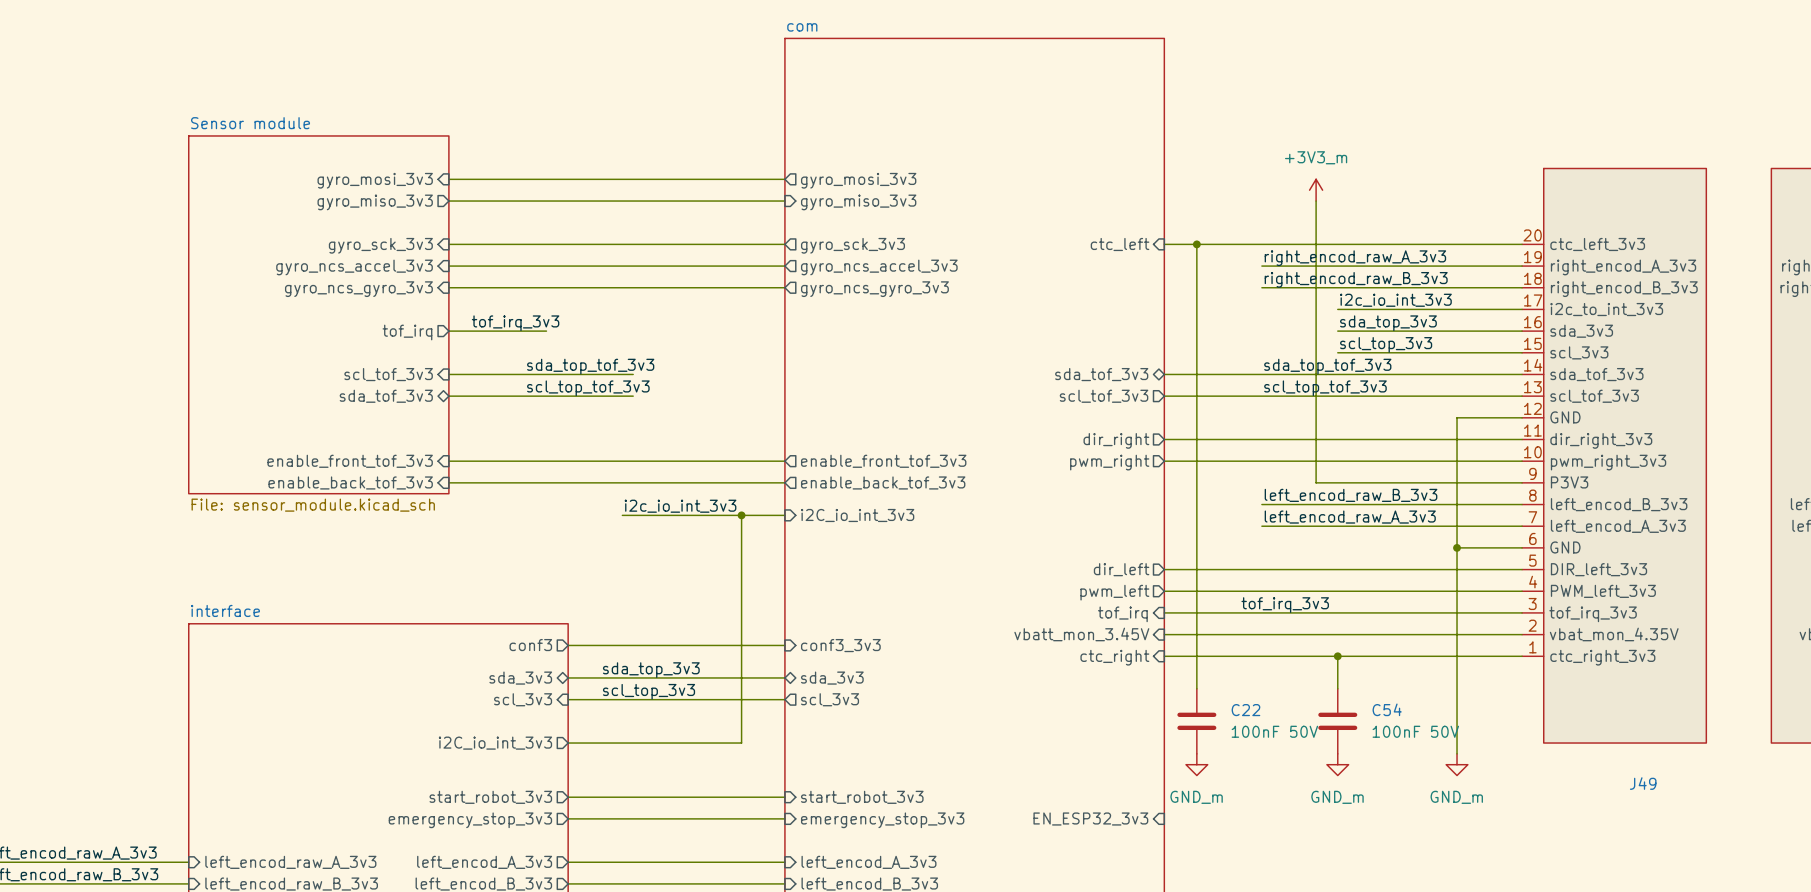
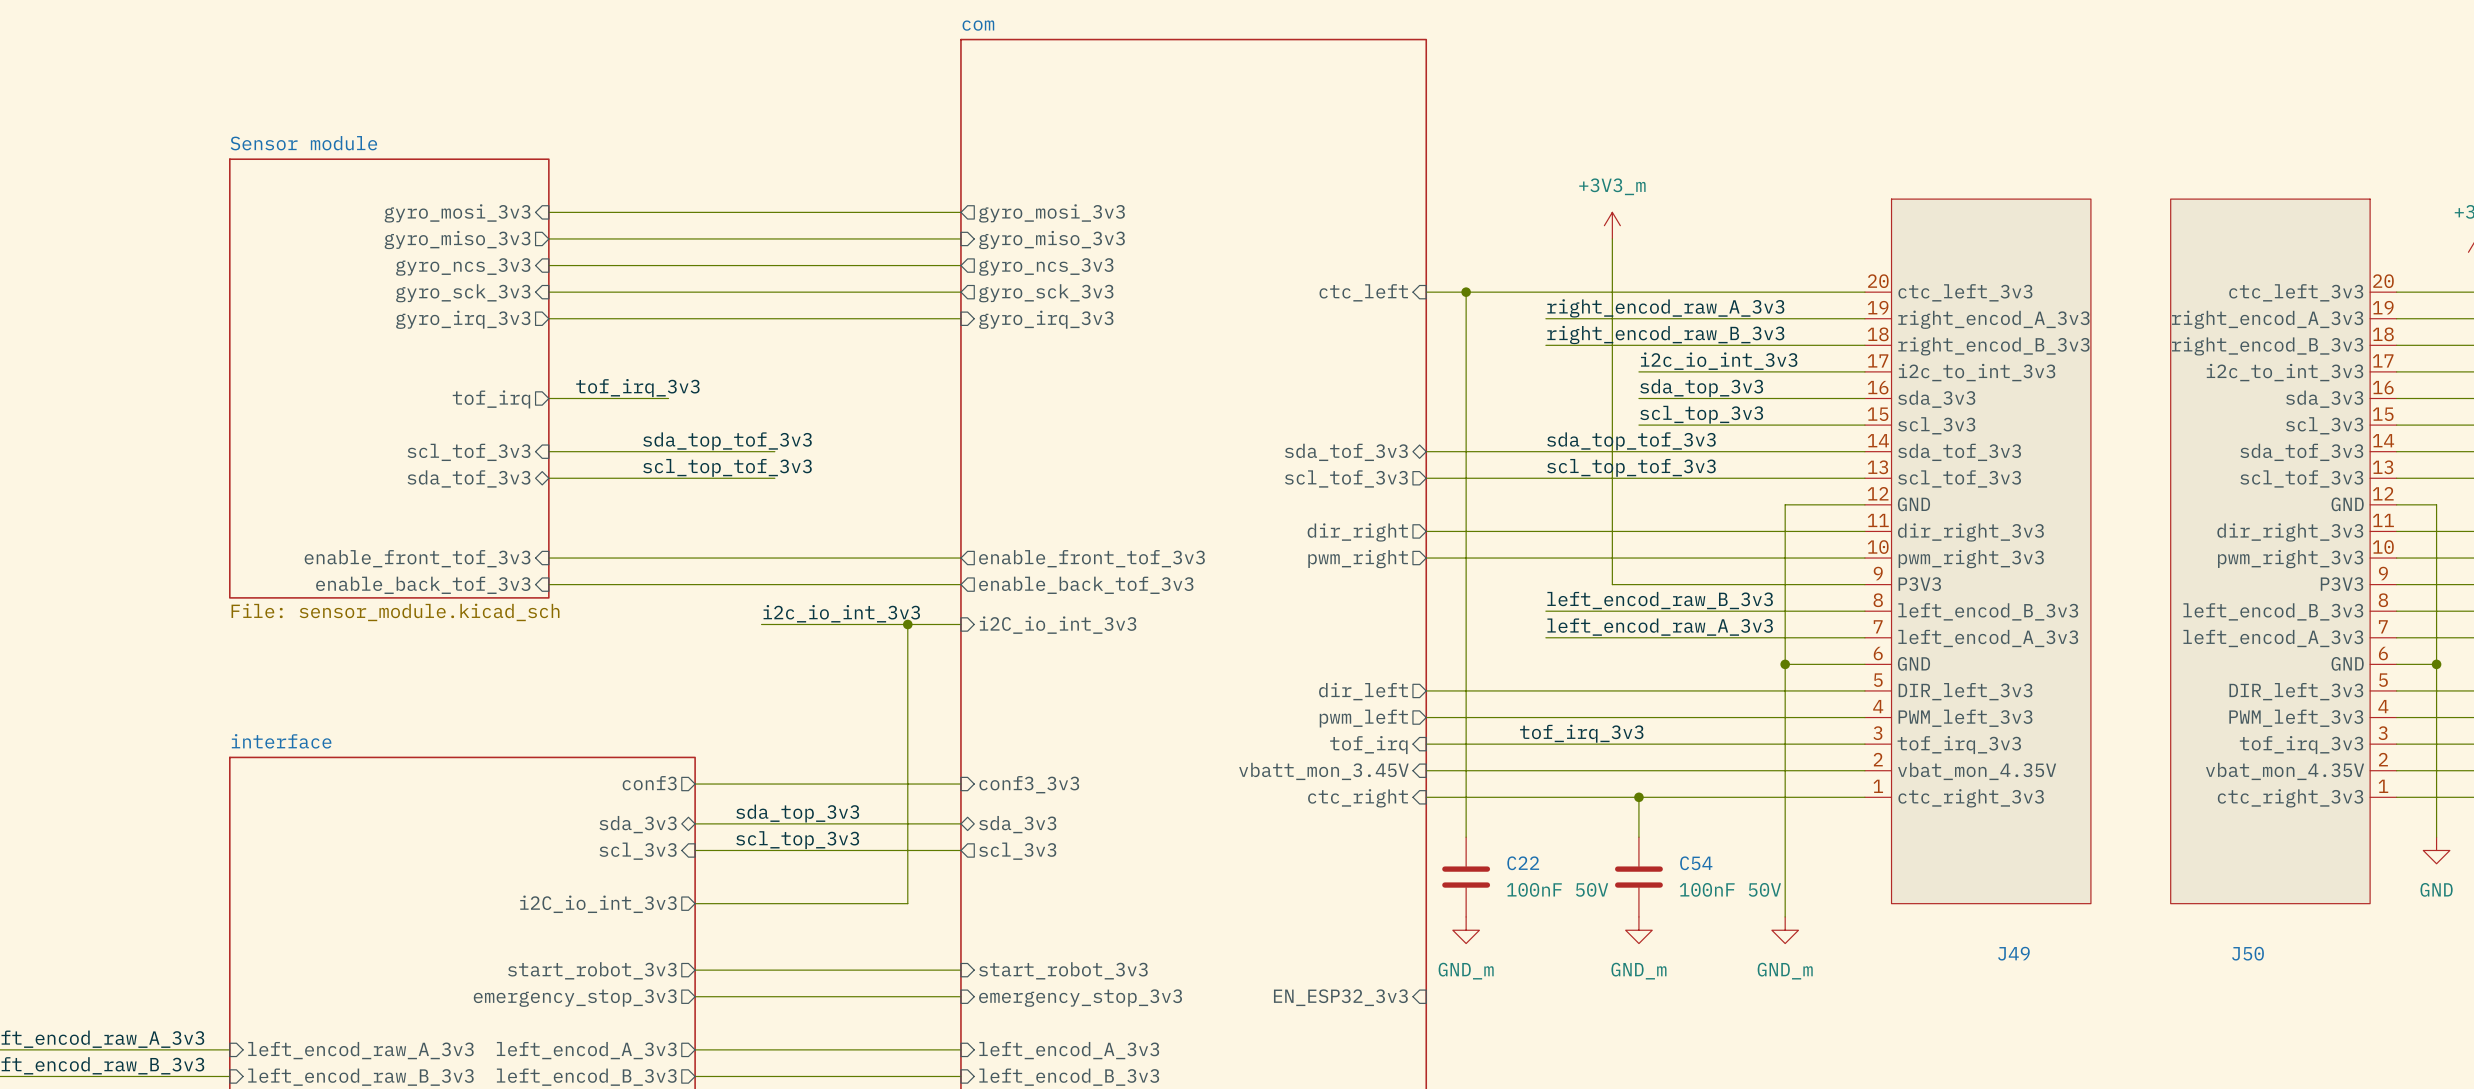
sheet pin: none -> gyro_ncs_3v3 (463, 266)
sheet pin: none -> gyro_ncs_3v3 (1046, 266)
sheet pin shape: input (354, 267) -> output (463, 319)
sheet pin: gyro_ncs_accel_3v3 (354, 267) -> gyro_irq_3v3 (463, 319)
sheet pin shape: output (879, 267) -> input (1046, 319)
sheet pin: gyro_ncs_accel_3v3 (879, 267) -> gyro_irq_3v3 (1046, 319)
wire: (448, 287) (784, 287) -> (548, 265) (960, 265)
sheet pin: gyro_ncs_gyro_3v3 (358, 289) -> none
sheet pin: gyro_ncs_gyro_3v3 (874, 289) -> none

